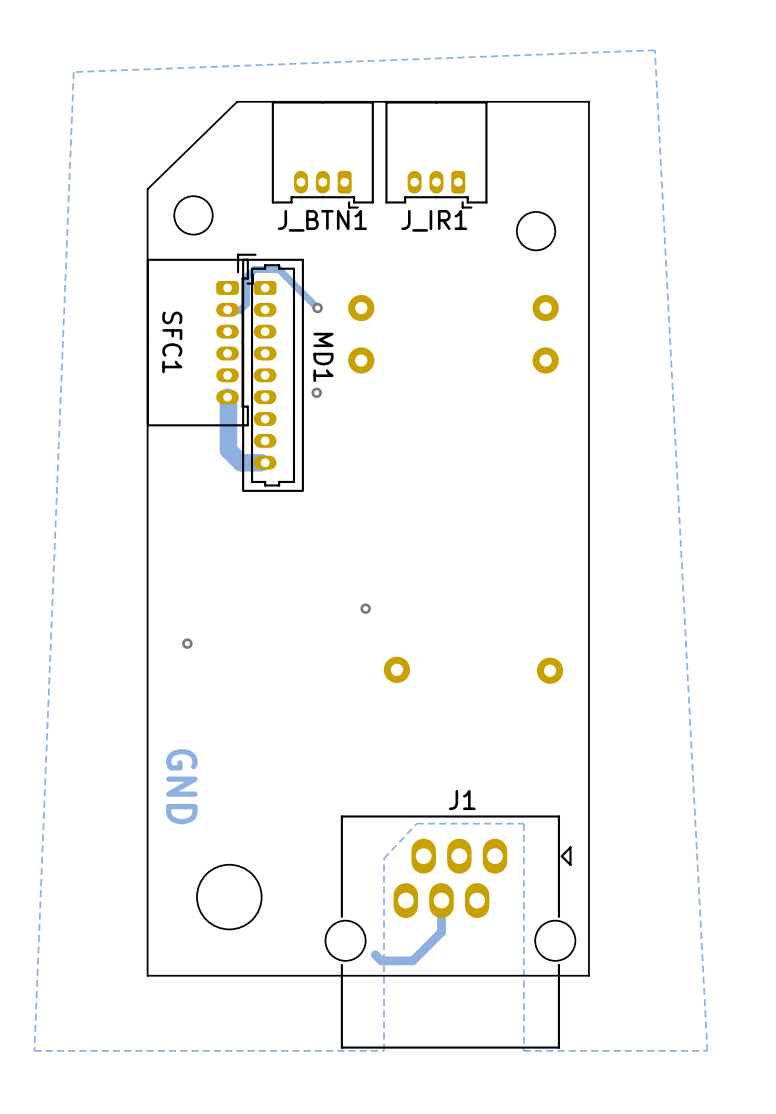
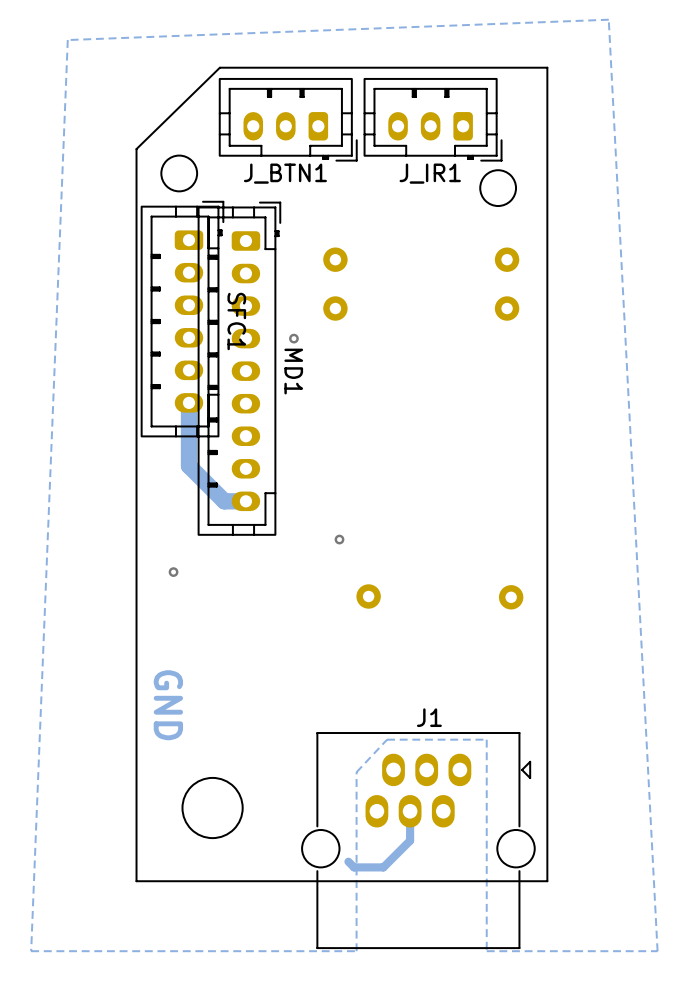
J_BTN1 footprint: [271, 101, 374, 209] -> [218, 77, 358, 162]
J_IR1 footprint: [385, 101, 488, 209] -> [363, 77, 503, 162]
MD1 footprint: [237, 253, 304, 492] -> [197, 201, 282, 536]
SFC1 footprint: [146, 258, 254, 427] -> [140, 200, 225, 438]
track: (317, 308) (279, 269) (254, 269) (246, 277) (246, 303) (239, 310) (228, 310) -> none
via: (317, 308) -> none
SFC1 name position: SFC1 (172, 342) -> SFC1 (236, 321)
track: (227, 397) (228, 450) (241, 462) (261, 462) -> none
track: none -> (188, 402) (188, 465) (224, 501) (245, 501)

